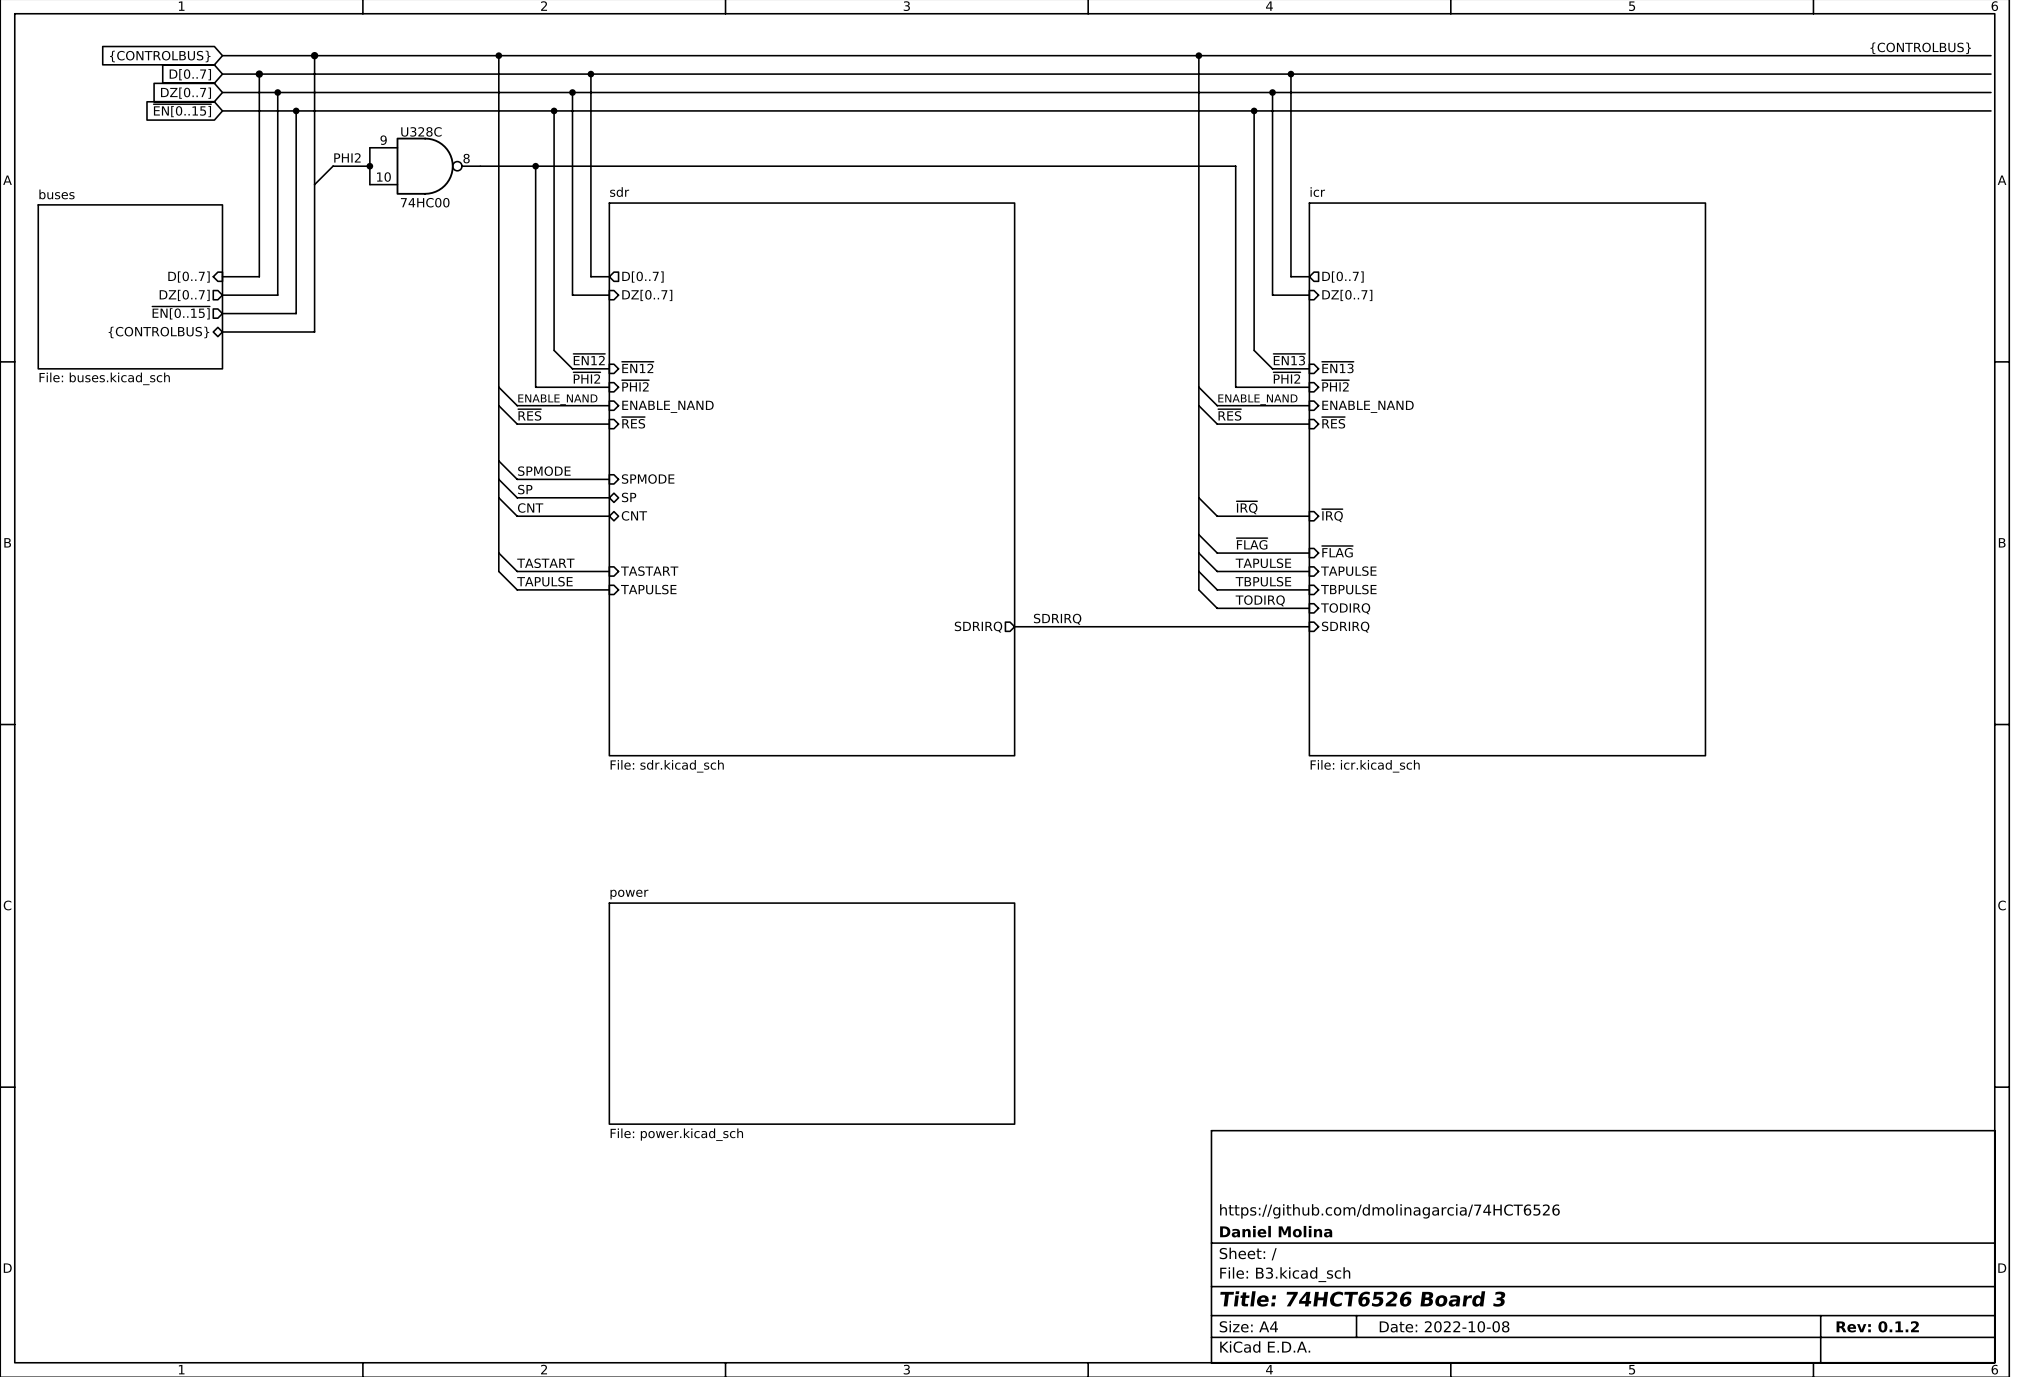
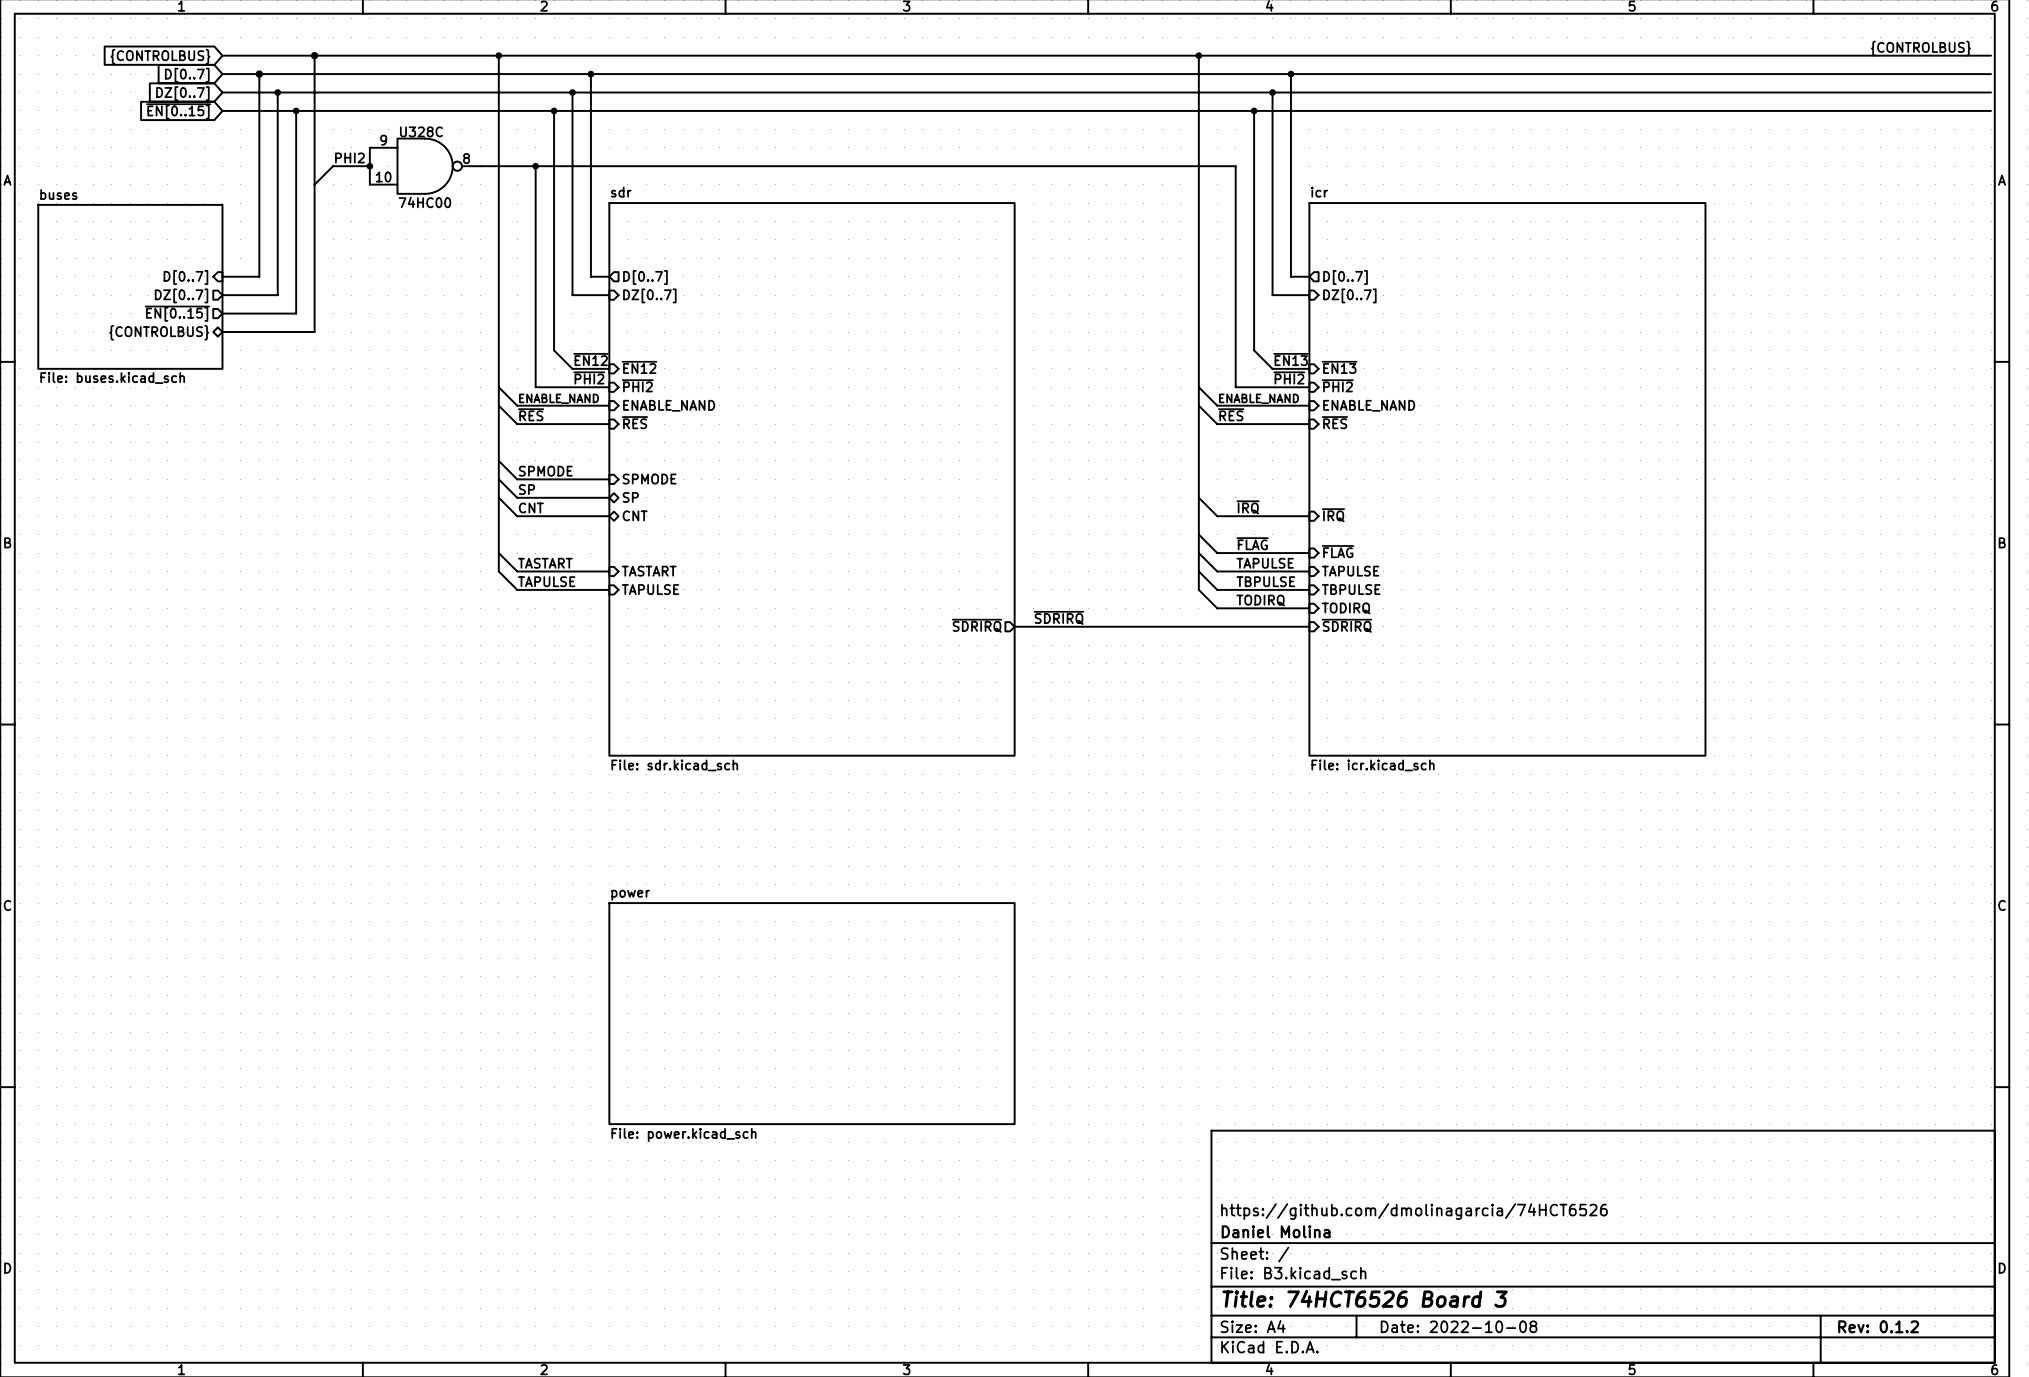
label: SDRIRQ (1057, 619) -> ~{SDRIRQ} (1059, 617)
sheet pin: SDRIRQ (978, 627) -> ~{SDRIRQ} (976, 625)
sheet pin: SDRIRQ (1345, 627) -> ~{SDRIRQ} (1347, 625)

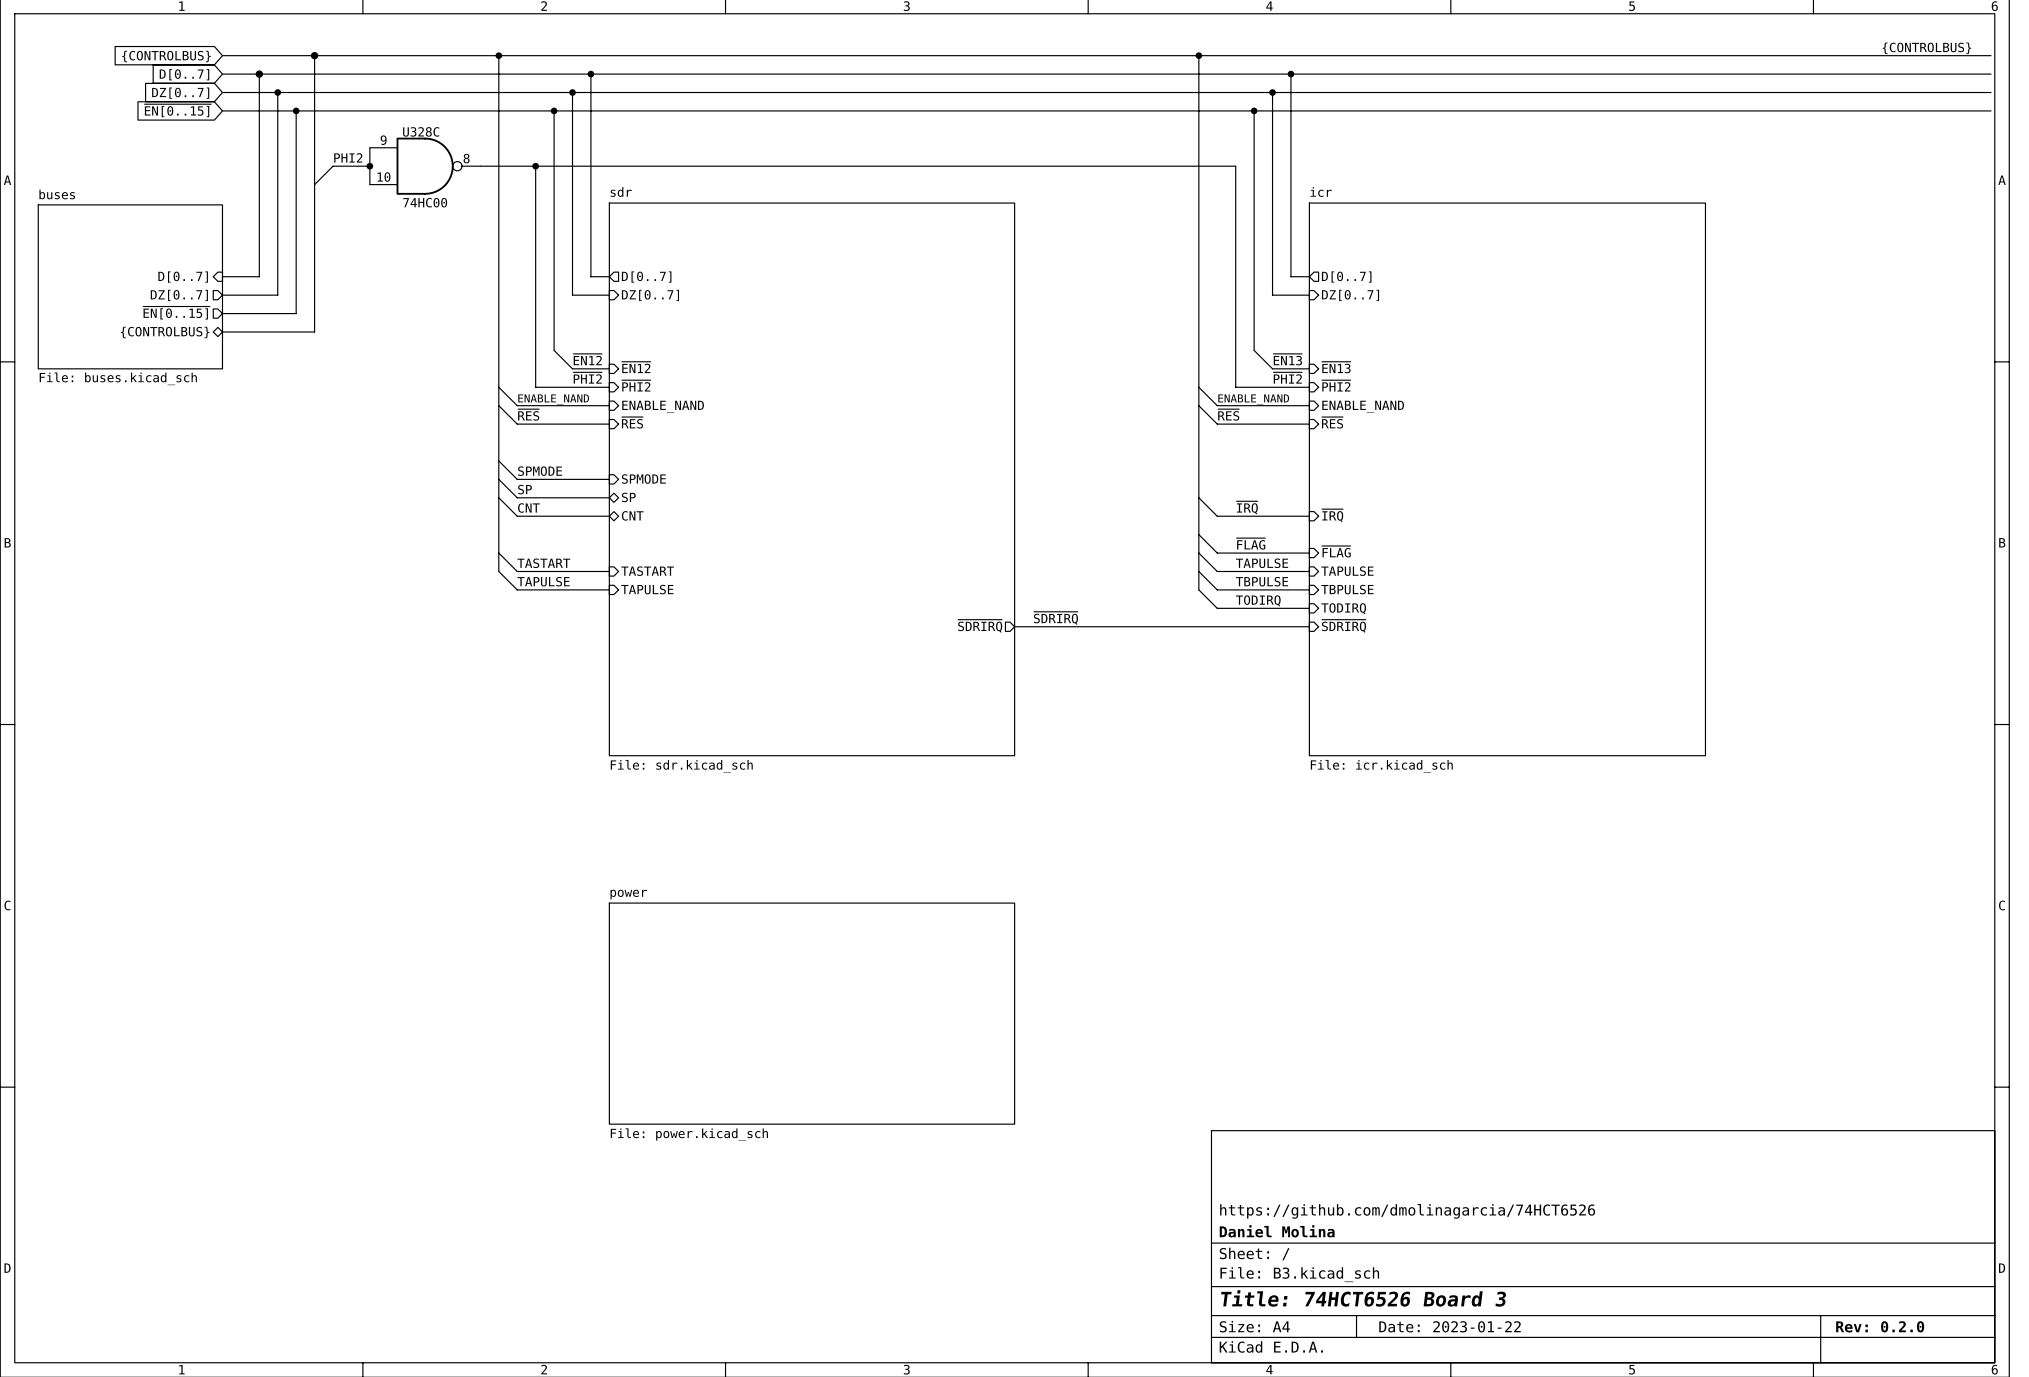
title block: Date: 2022-10-08 (1459, 1326) -> Date: 2023-01-22 (1450, 1326)
title block: Rev: 0.1.2 (1878, 1326) -> Rev: 0.2.0 (1880, 1326)

